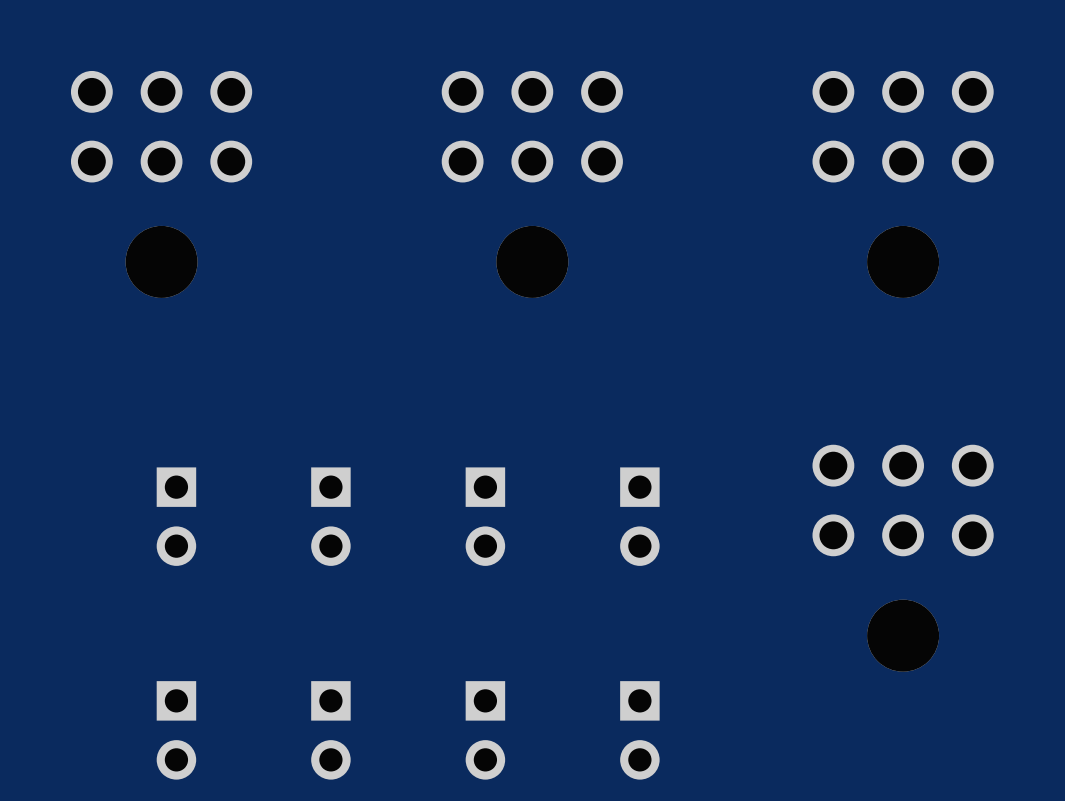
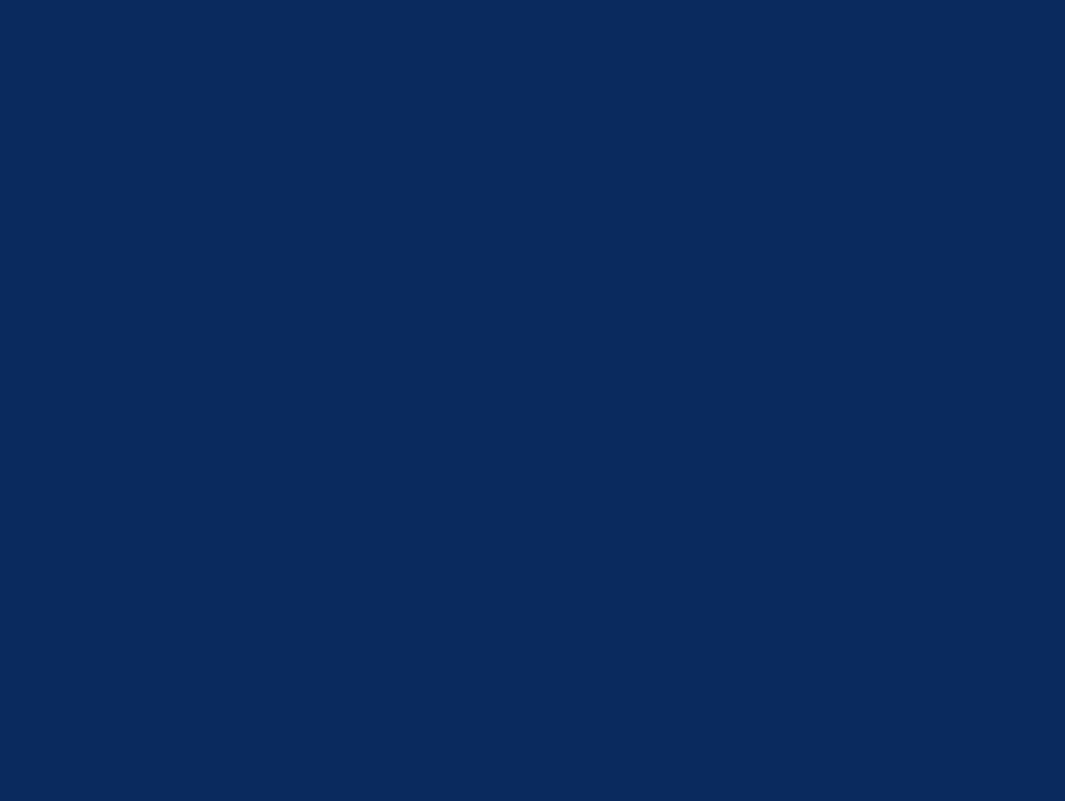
part: (161, 184) -> none
part: (532, 184) -> none
part: (903, 184) -> none
part: (176, 516) -> none
part: (330, 516) -> none
part: (485, 516) -> none
part: (639, 516) -> none
part: (903, 558) -> none
part: (176, 730) -> none
part: (330, 730) -> none
part: (485, 730) -> none
part: (639, 730) -> none

